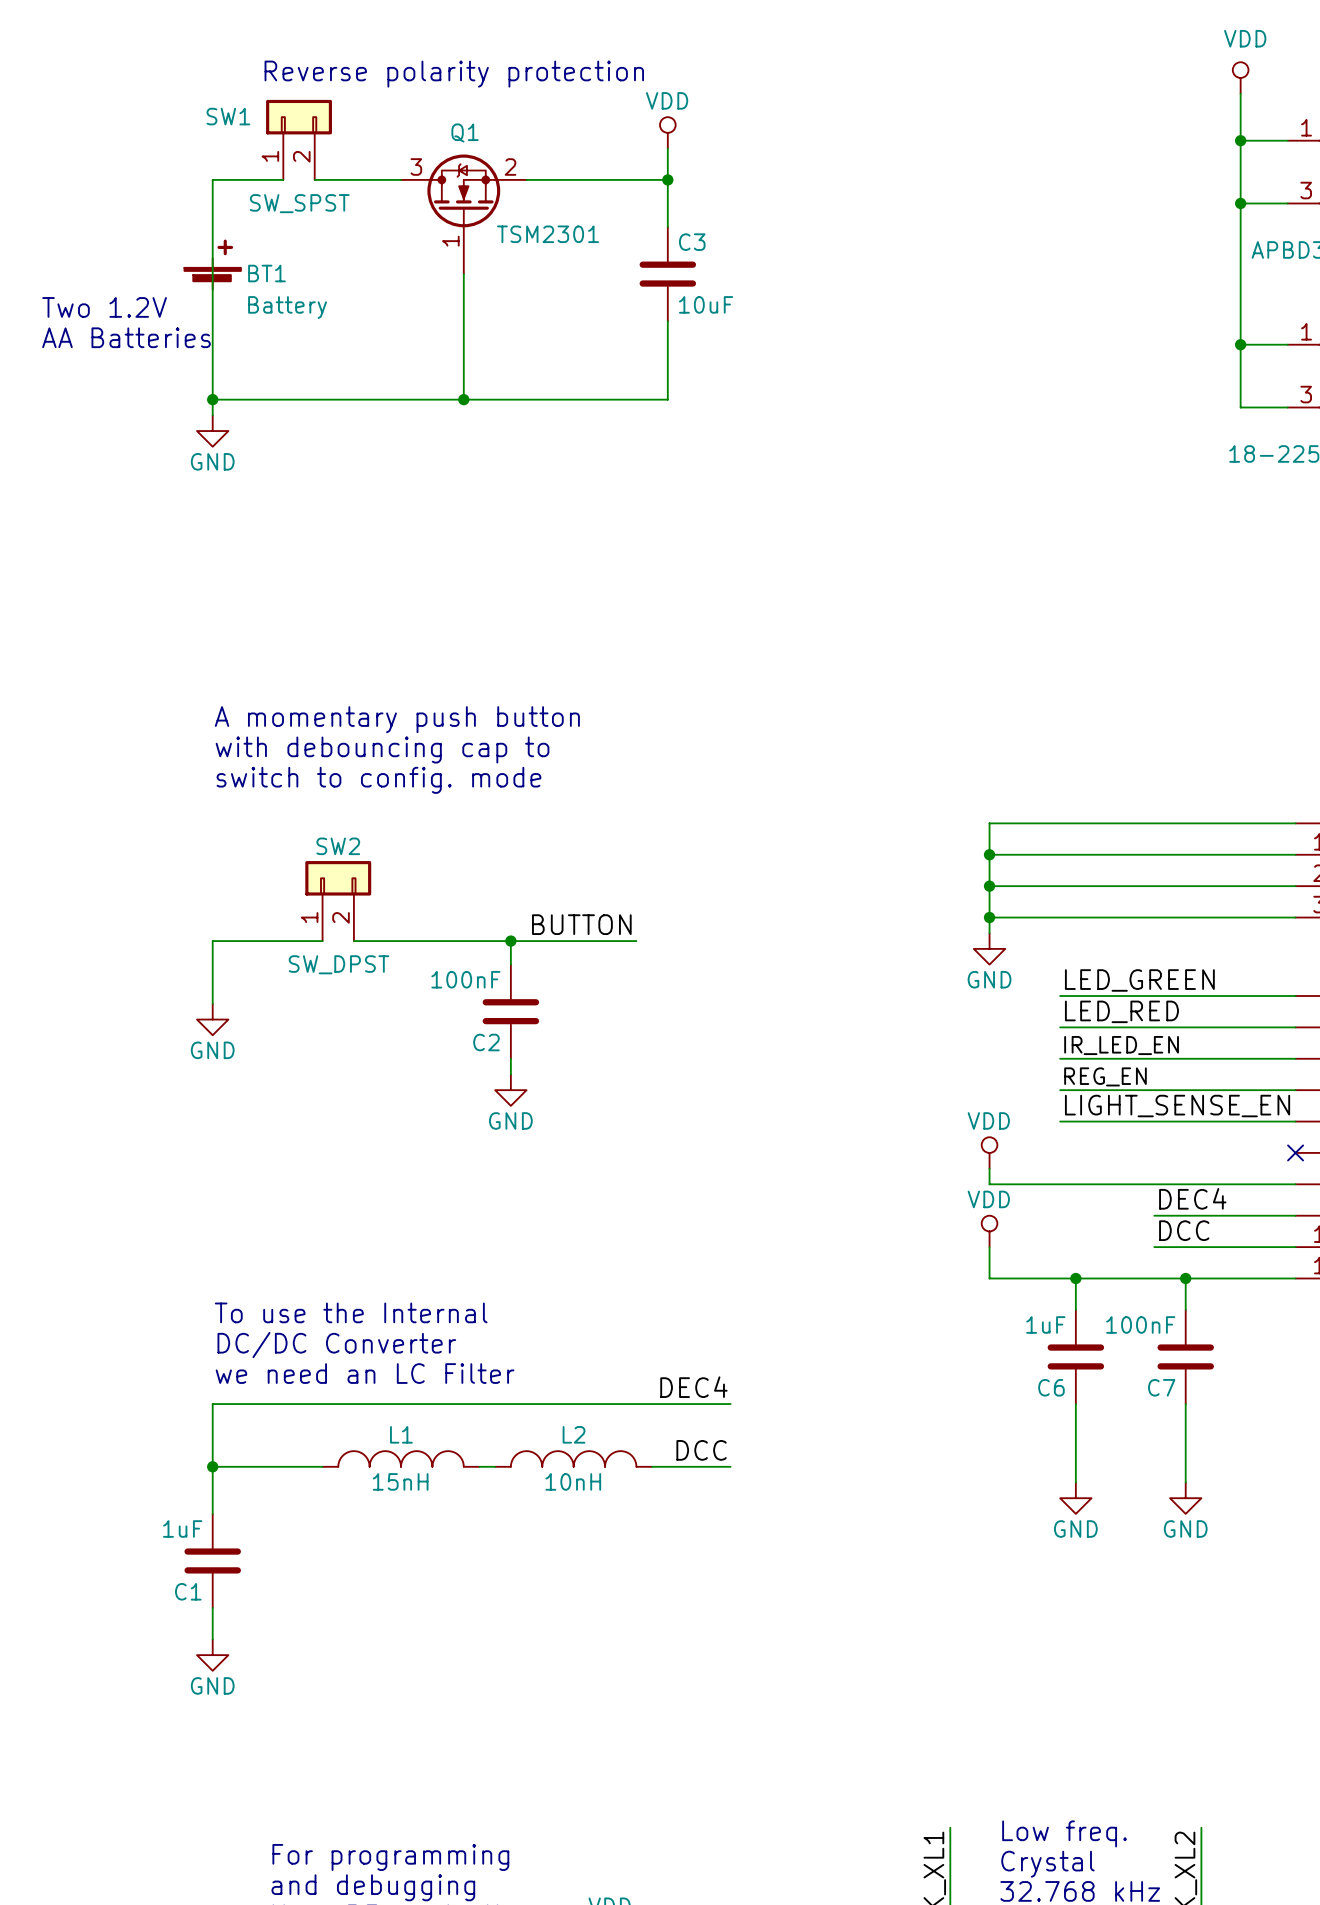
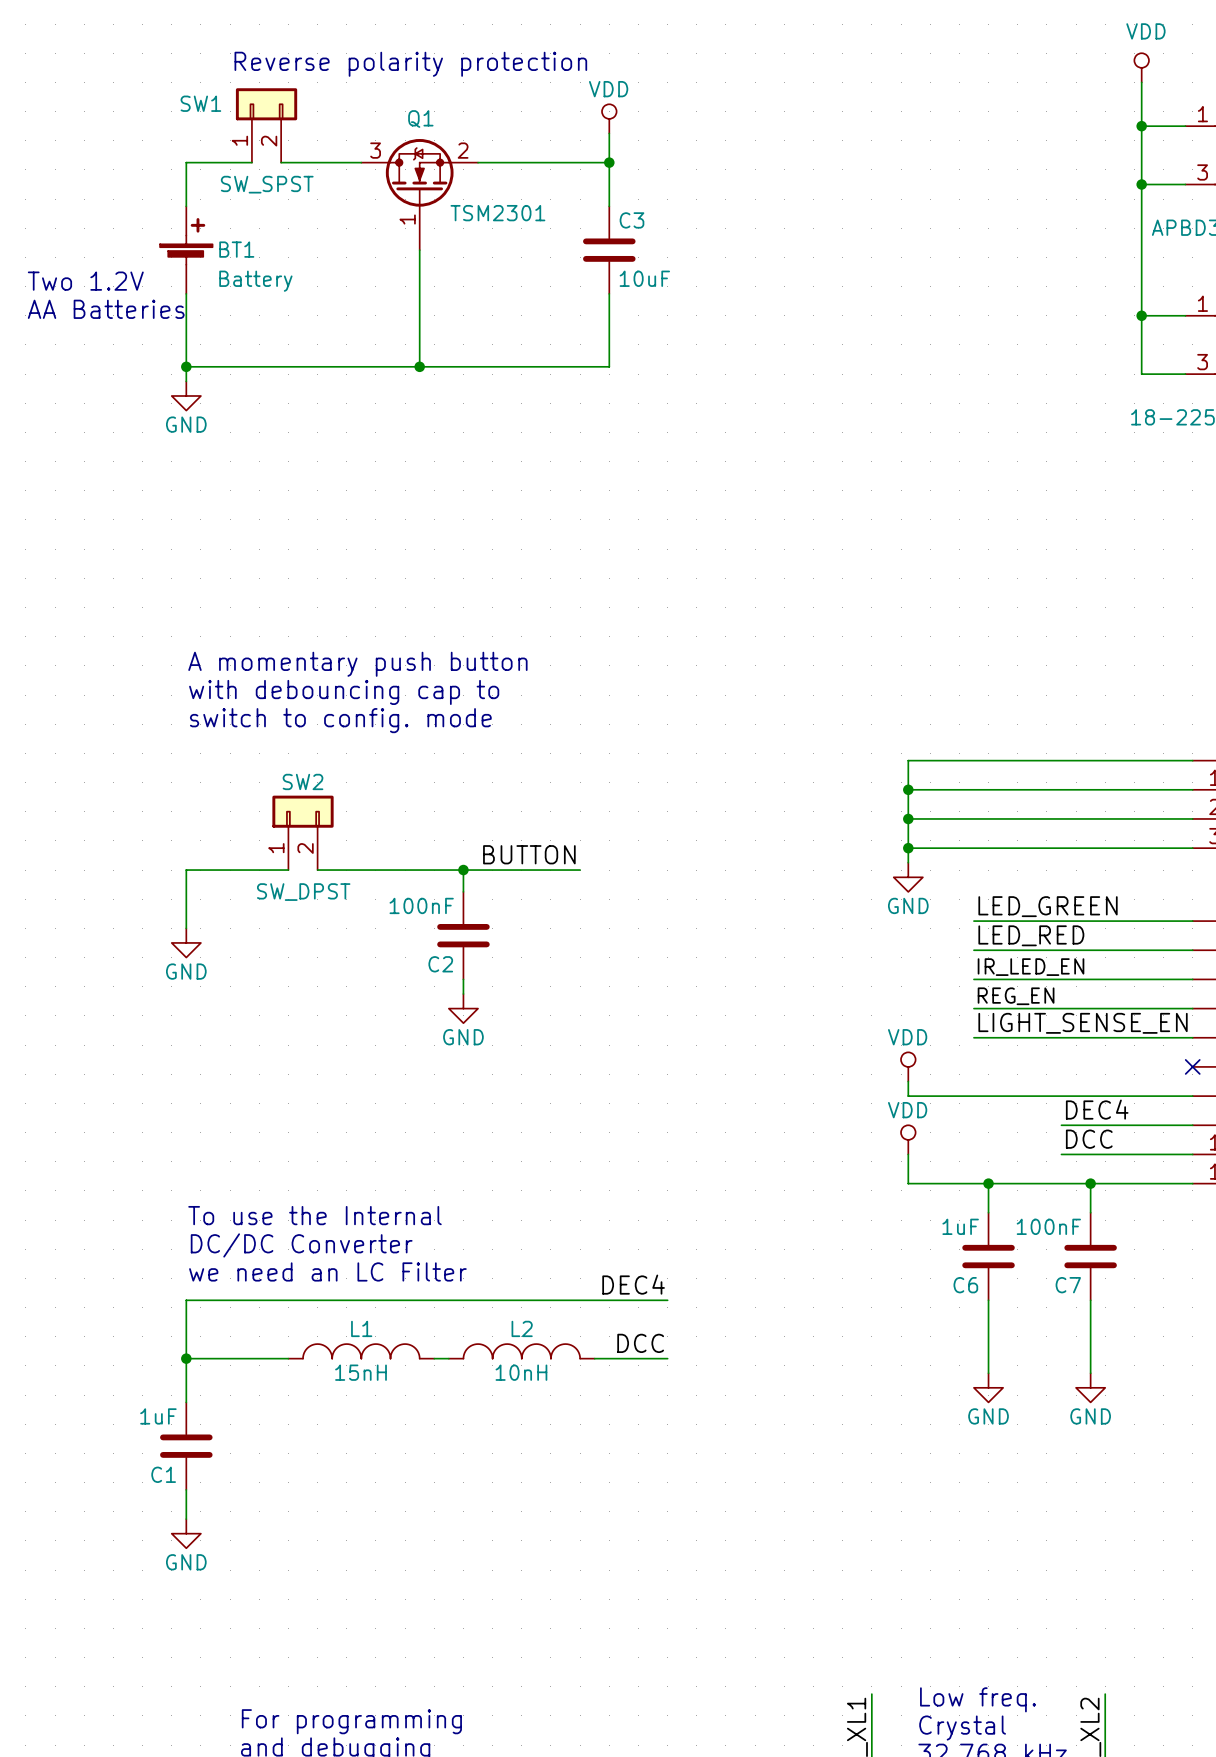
BT1 symbol: [184, 239, 241, 290] -> [160, 206, 213, 294]

